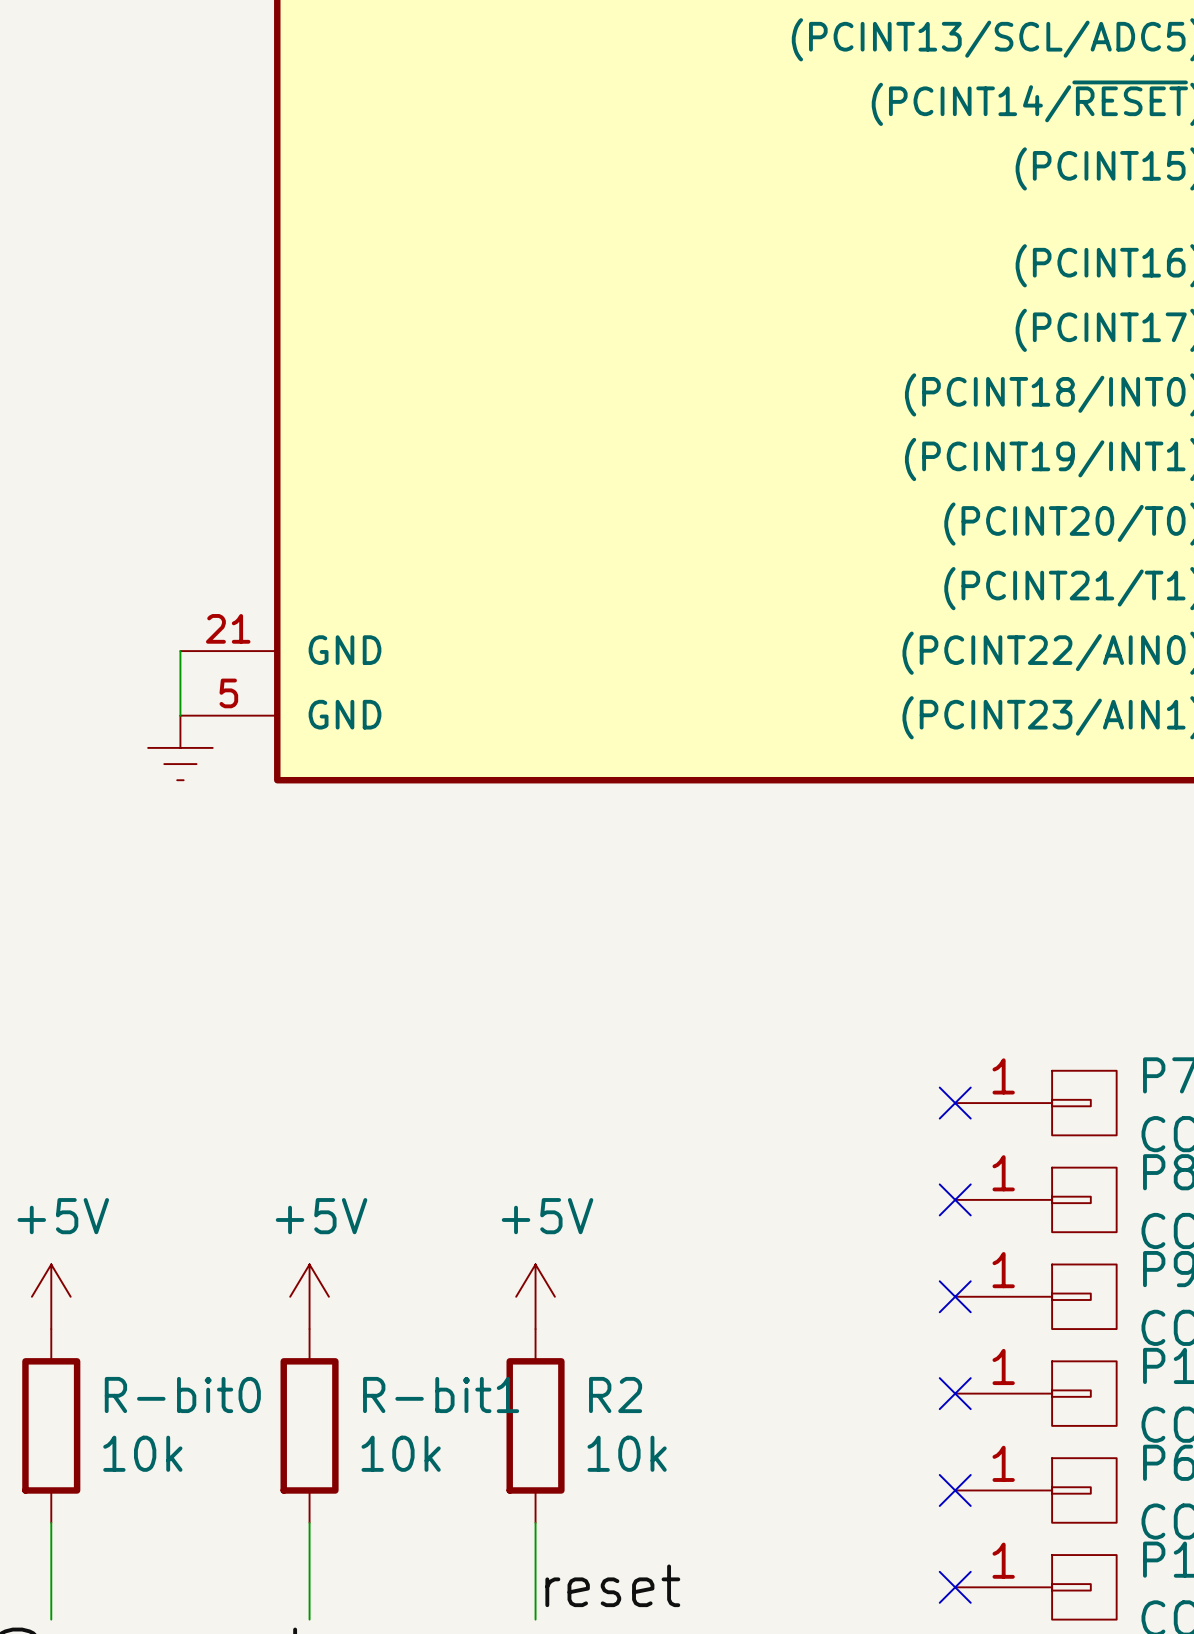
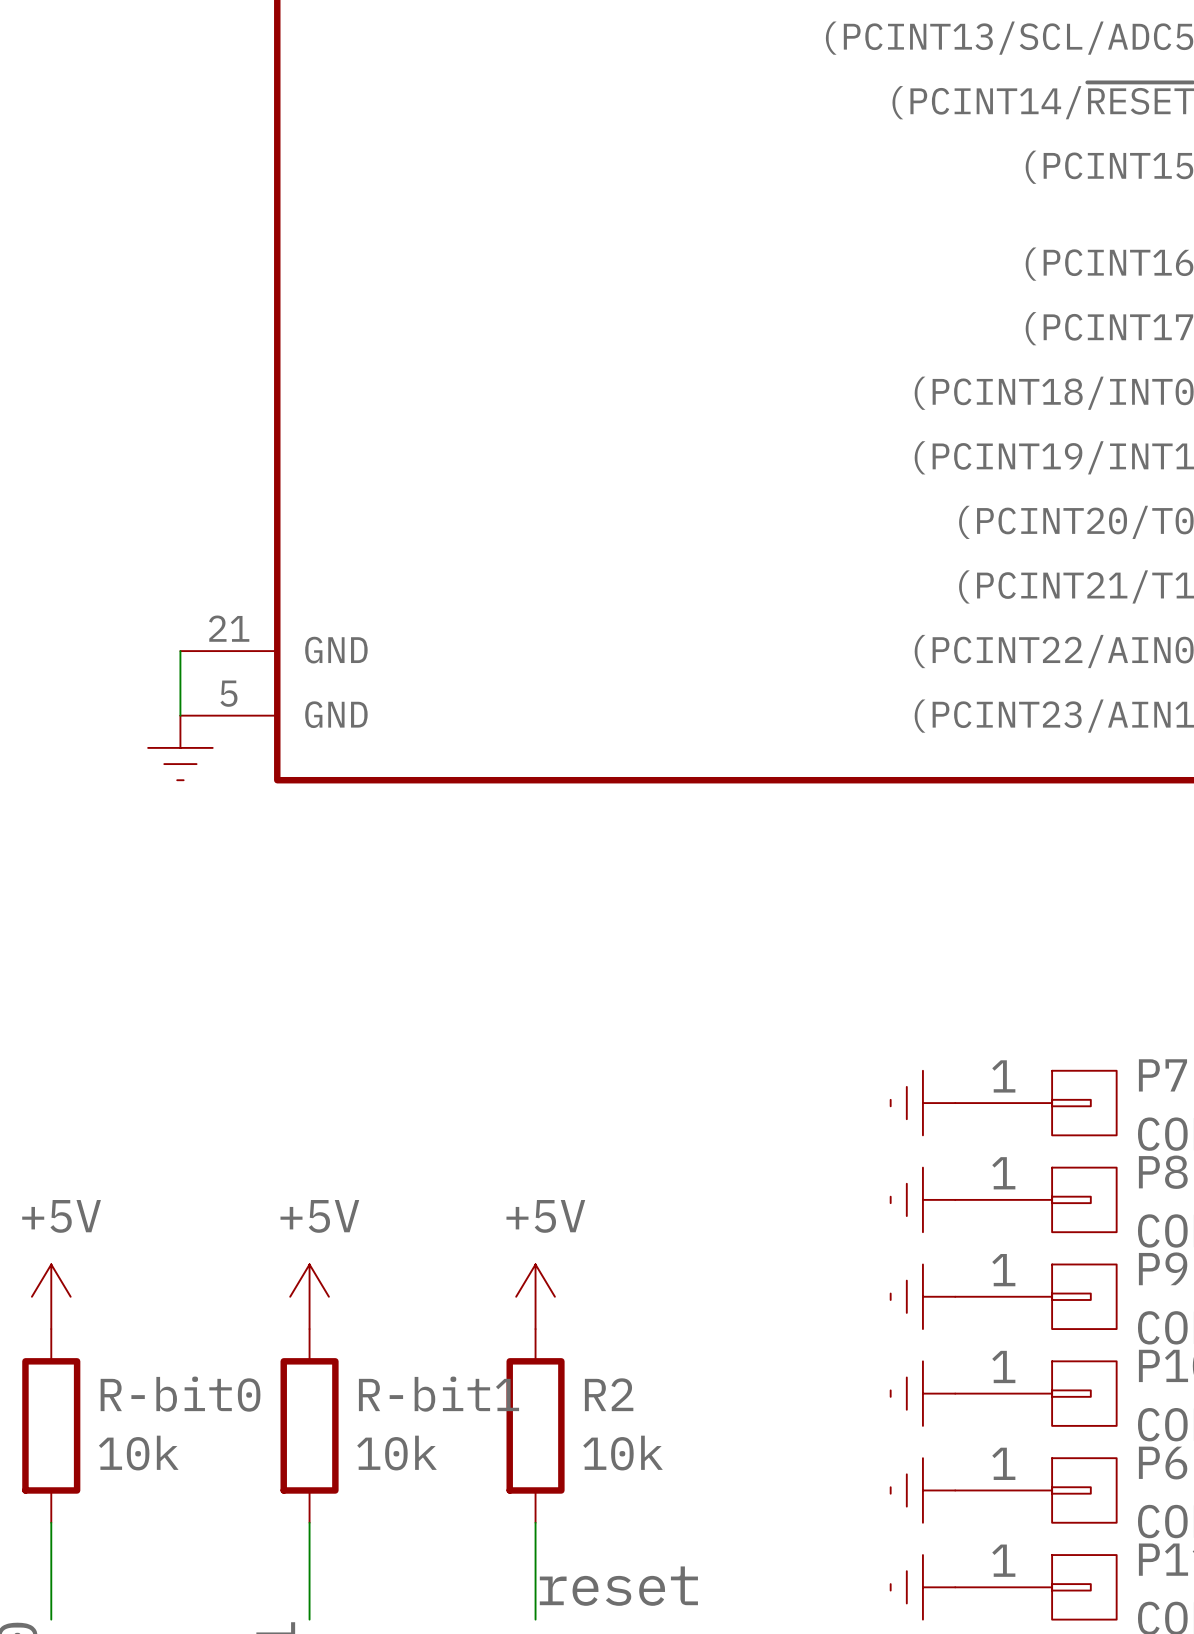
power symbol: none -> (922, 1103)
no-connect mark: (955, 1103) -> none
power symbol: none -> (922, 1199)
no-connect mark: (955, 1199) -> none
power symbol: none -> (922, 1296)
no-connect mark: (955, 1296) -> none
power symbol: none -> (922, 1393)
no-connect mark: (955, 1393) -> none
power symbol: none -> (922, 1490)
no-connect mark: (955, 1490) -> none
power symbol: none -> (922, 1587)
no-connect mark: (955, 1587) -> none

